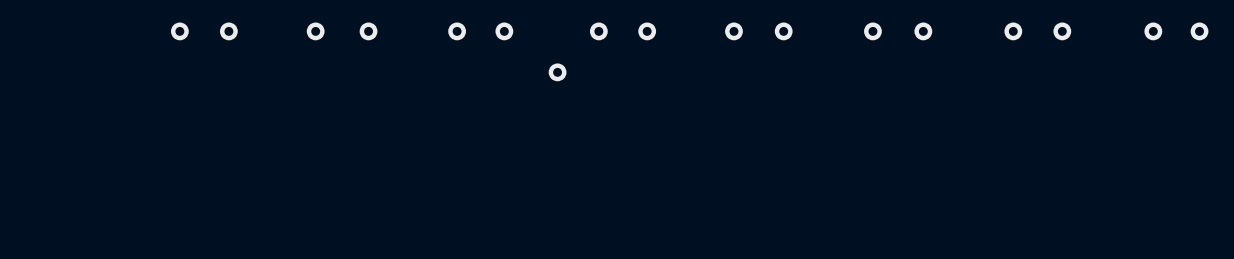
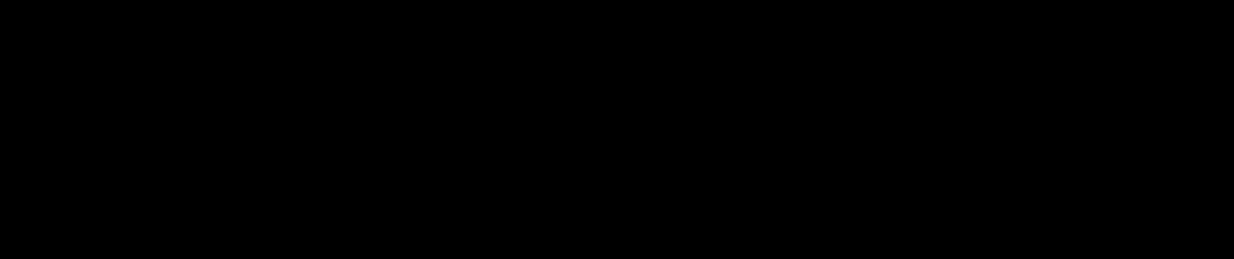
via: (179, 31) -> none
via: (228, 31) -> none
via: (315, 31) -> none
via: (368, 31) -> none
via: (457, 31) -> none
via: (504, 31) -> none
via: (598, 31) -> none
via: (647, 31) -> none
via: (733, 31) -> none
via: (783, 31) -> none
via: (872, 31) -> none
via: (923, 31) -> none
via: (1013, 31) -> none
via: (1062, 31) -> none
via: (1153, 31) -> none
via: (1199, 31) -> none
via: (557, 72) -> none

